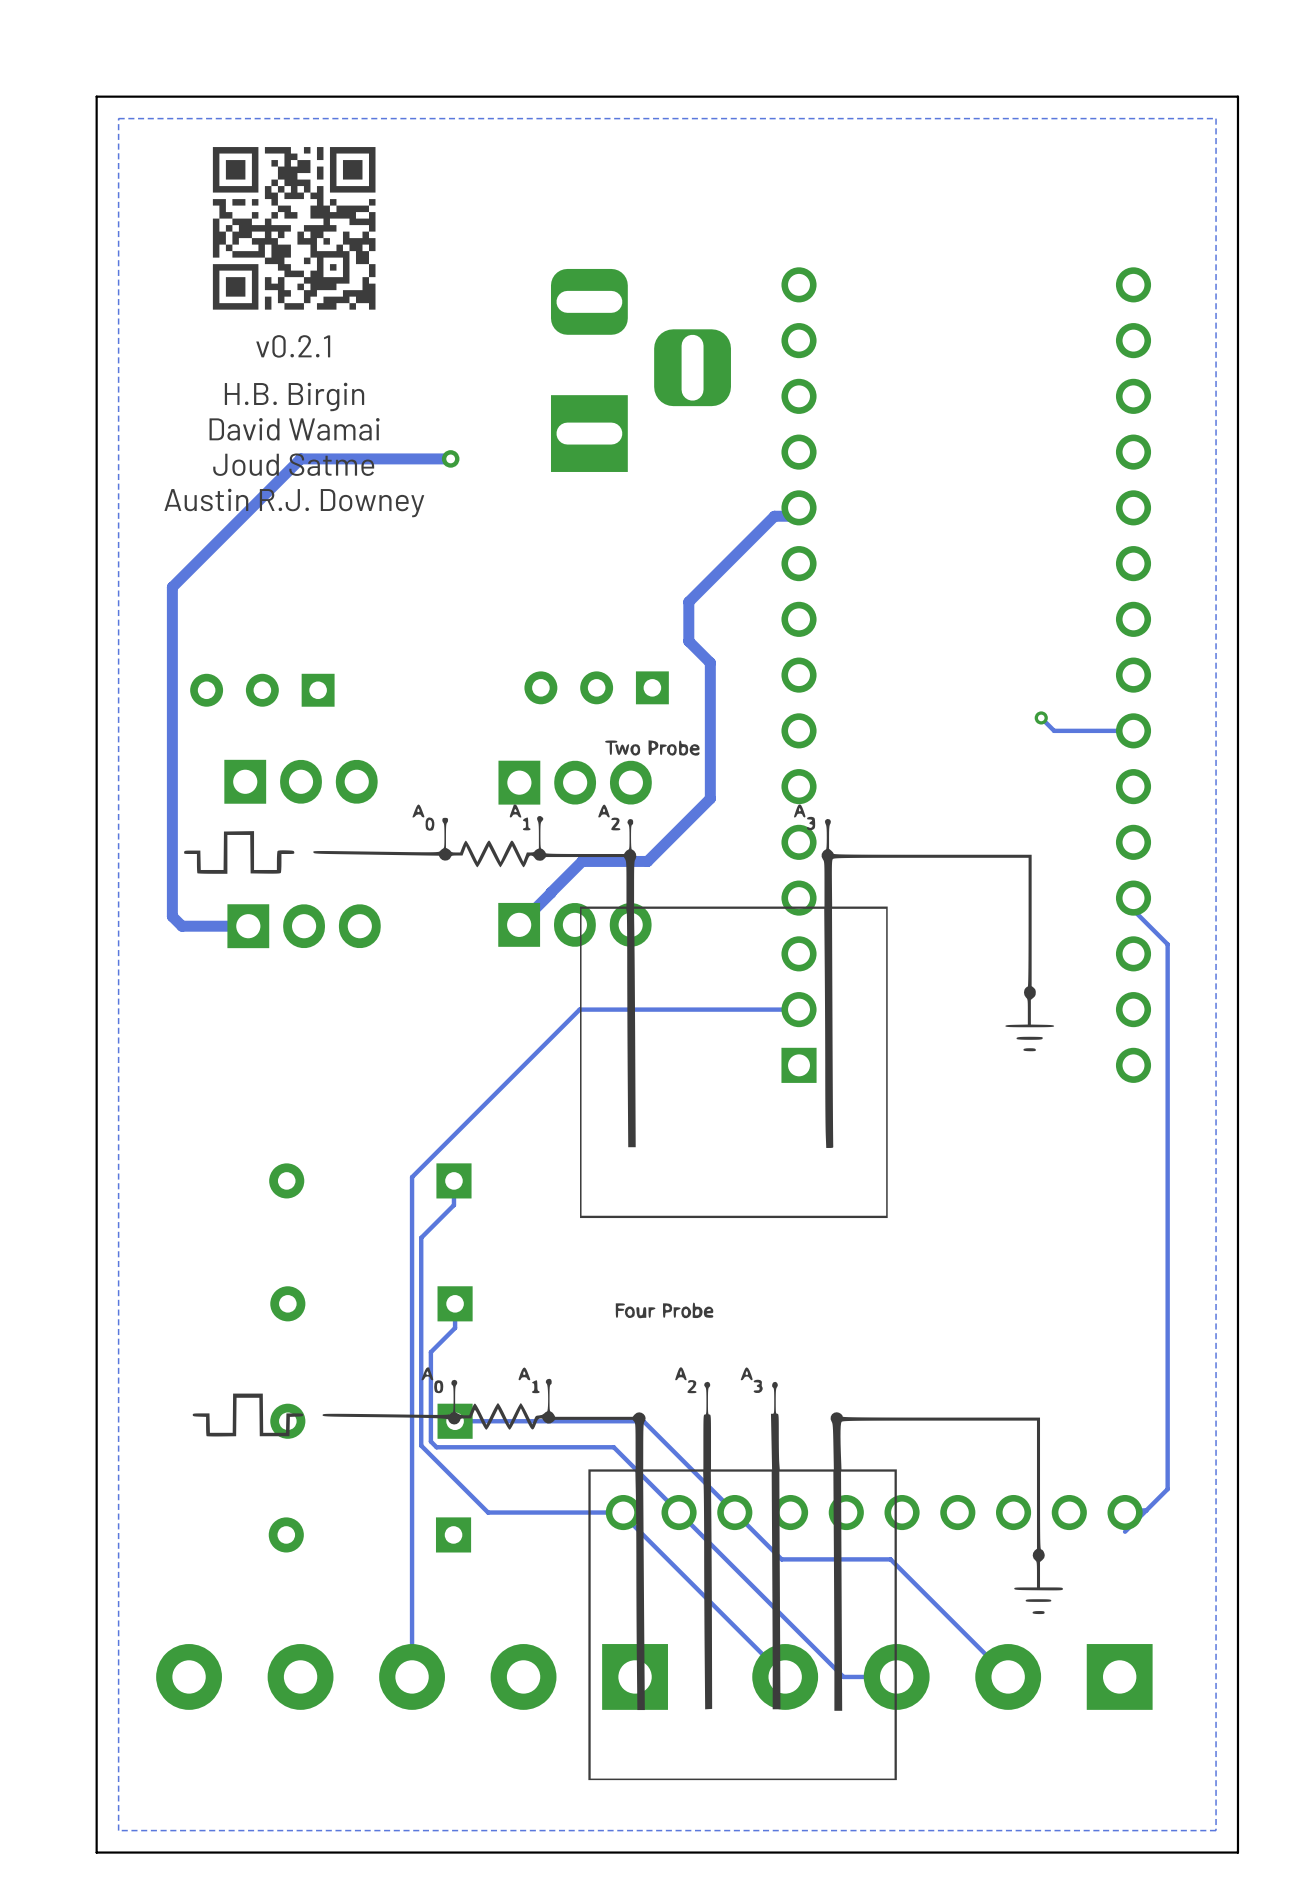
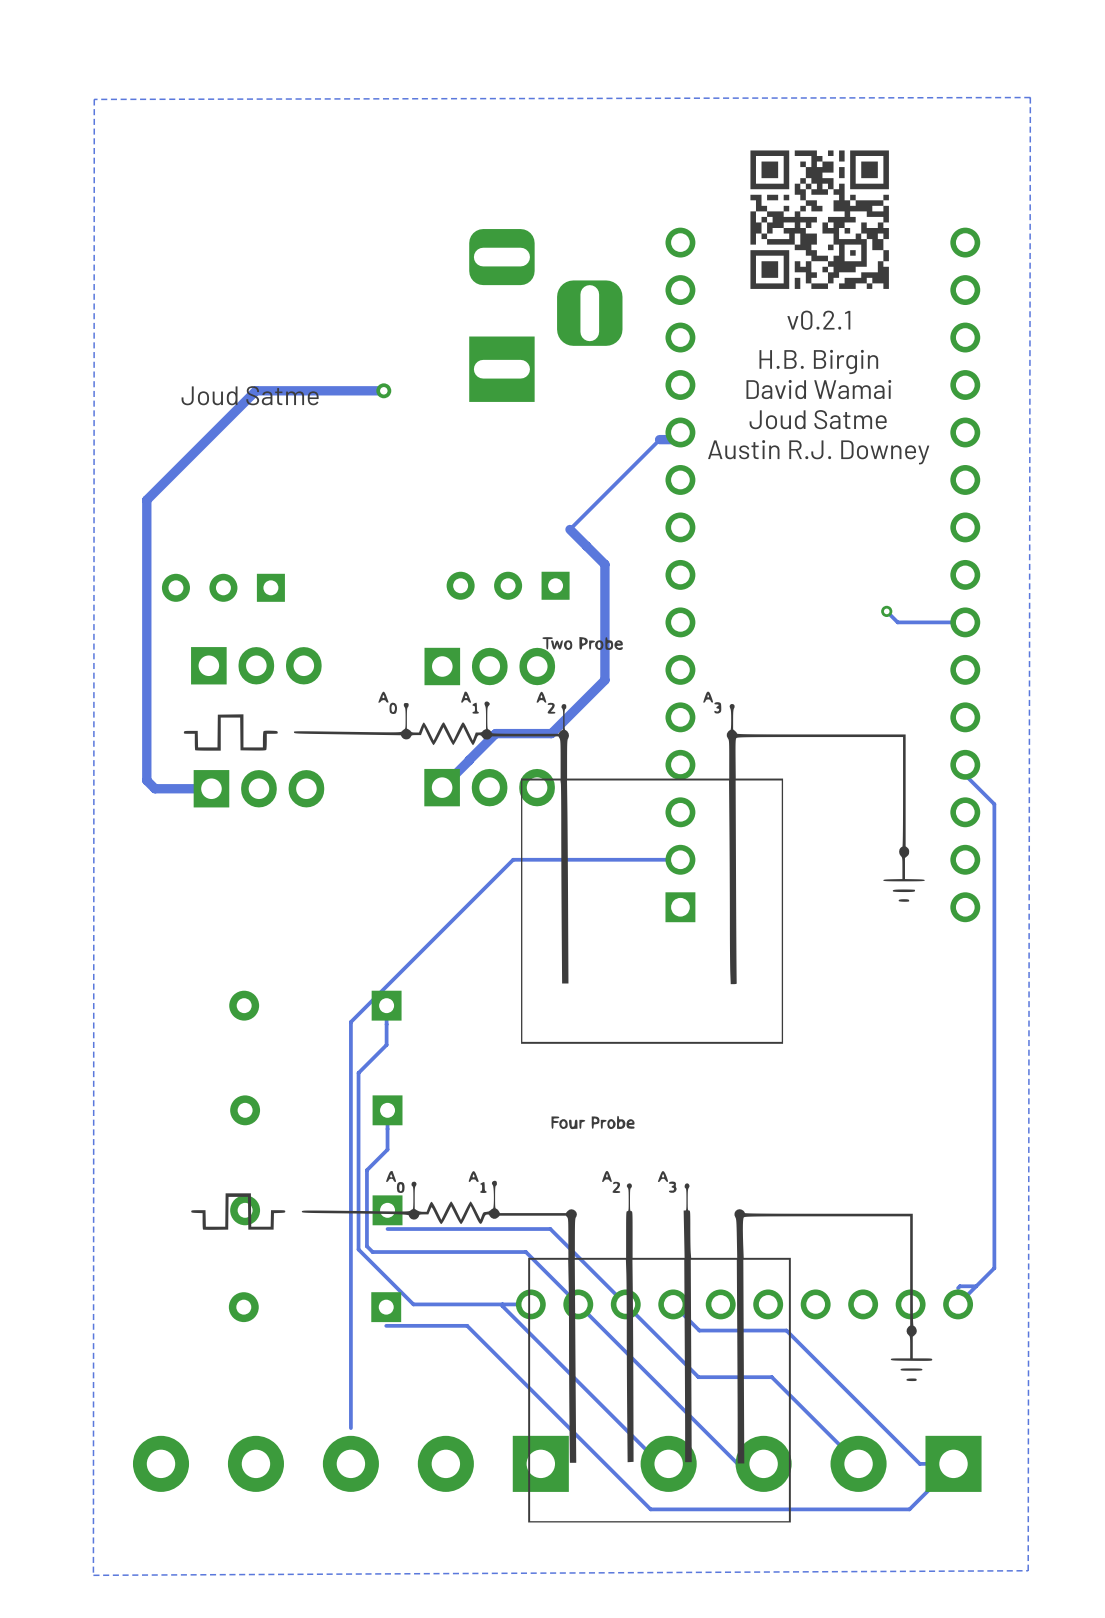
board edge: (1237, 96) (96, 96) (96, 1852) (1237, 1852) (1237, 96) -> none
zone outline: (1216, 118) (1216, 1830) (118, 1830) (118, 118) (1216, 118) -> (1030, 97) (1028, 1570) (93, 1575) (94, 99) (1030, 97)
drawing: [212, 147, 376, 310] -> none
drawing: none -> [750, 150, 889, 289]
text: v0.2.1 (293, 346) -> none
text: none -> v0.2.1 (818, 320)
text: H.B. Birgin (294, 396) -> none
text: none -> H.B. Birgin (818, 361)
text: David Wamai (294, 429) -> none
text: none -> David Wamai (818, 389)
text: none -> Joud Satme (818, 419)
text: Austin R.J. Downey (294, 502) -> none
track: (774, 516) (688, 601) (688, 641) -> (659, 439) (569, 529) (586, 546)
text: none -> Austin R.J. Downey (818, 452)
track: (602, 1009) (579, 1009) (412, 1177) (412, 1200) -> (513, 859) (350, 1022)
track: (453, 1205) (421, 1237) (421, 1445) (488, 1512) (623, 1512) (623, 1515) (785, 1676) -> (386, 1026) (386, 1044) (358, 1073) (358, 1249) (413, 1304) (530, 1304)
drawing position: (623, 1260) -> (558, 1079)
track: (455, 1328) (430, 1352) (430, 1374) -> (387, 1130) (387, 1149) (366, 1170)
track: (455, 1421) (643, 1421) (781, 1559) (890, 1559) (1008, 1676) -> none
track: (430, 1441) (436, 1447) (613, 1447) (843, 1676) (896, 1676) -> (366, 1227) (366, 1246) (372, 1252) (525, 1252) (737, 1463) (763, 1463)
track: none -> (387, 1229) (550, 1229) (698, 1377) (771, 1377) (858, 1463)
part position: (874, 1512) -> (744, 1304)
track: none -> (502, 1304) (660, 1463) (668, 1463)
track: none -> (673, 1304) (699, 1330) (786, 1330) (919, 1463) (953, 1465)
track: none -> (386, 1325) (467, 1325) (650, 1509) (909, 1509) (955, 1463)
part position: (412, 1676) -> (350, 1463)
part position: (952, 1676) -> (811, 1463)

